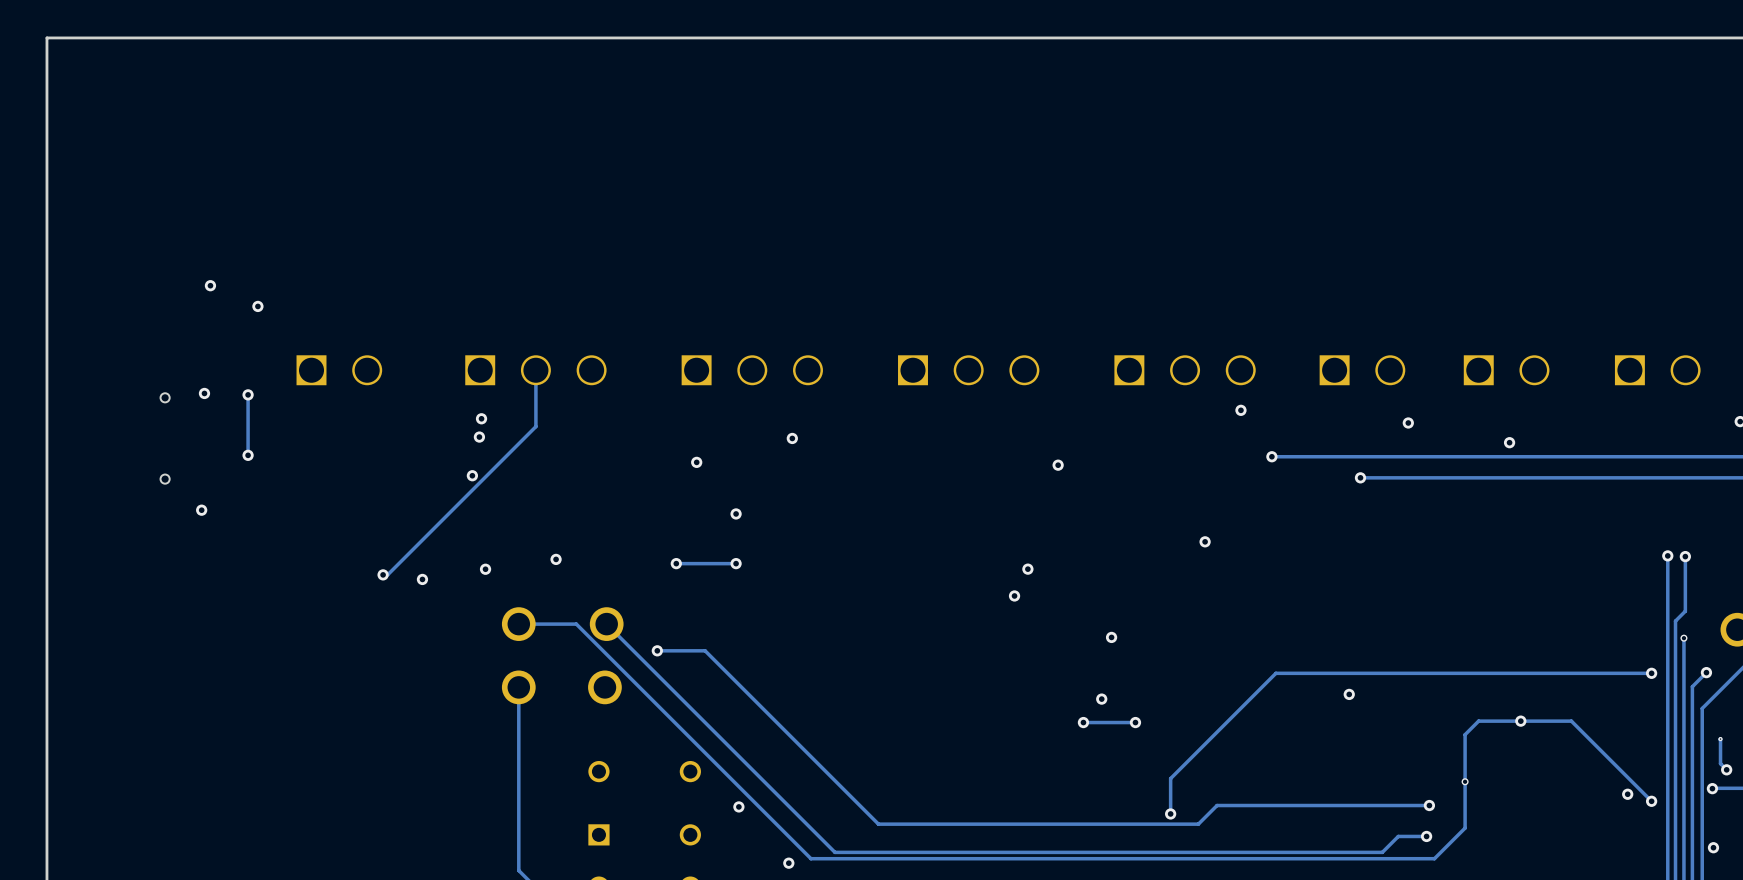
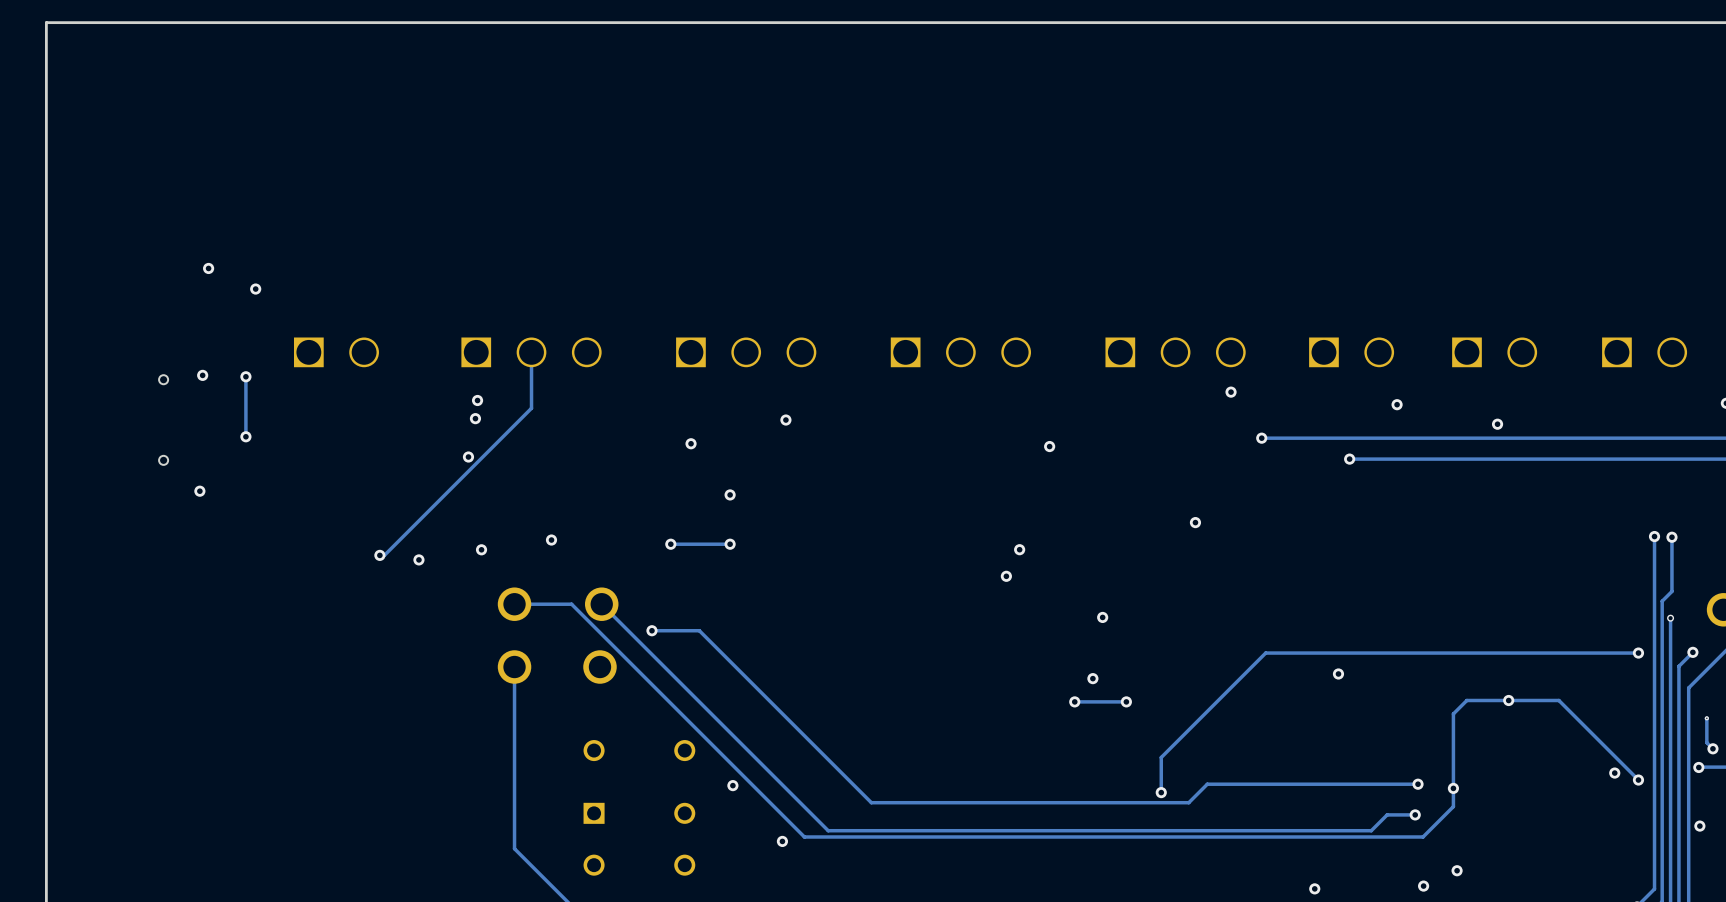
via: (1465, 781) -> none
via: none -> (1453, 788)

